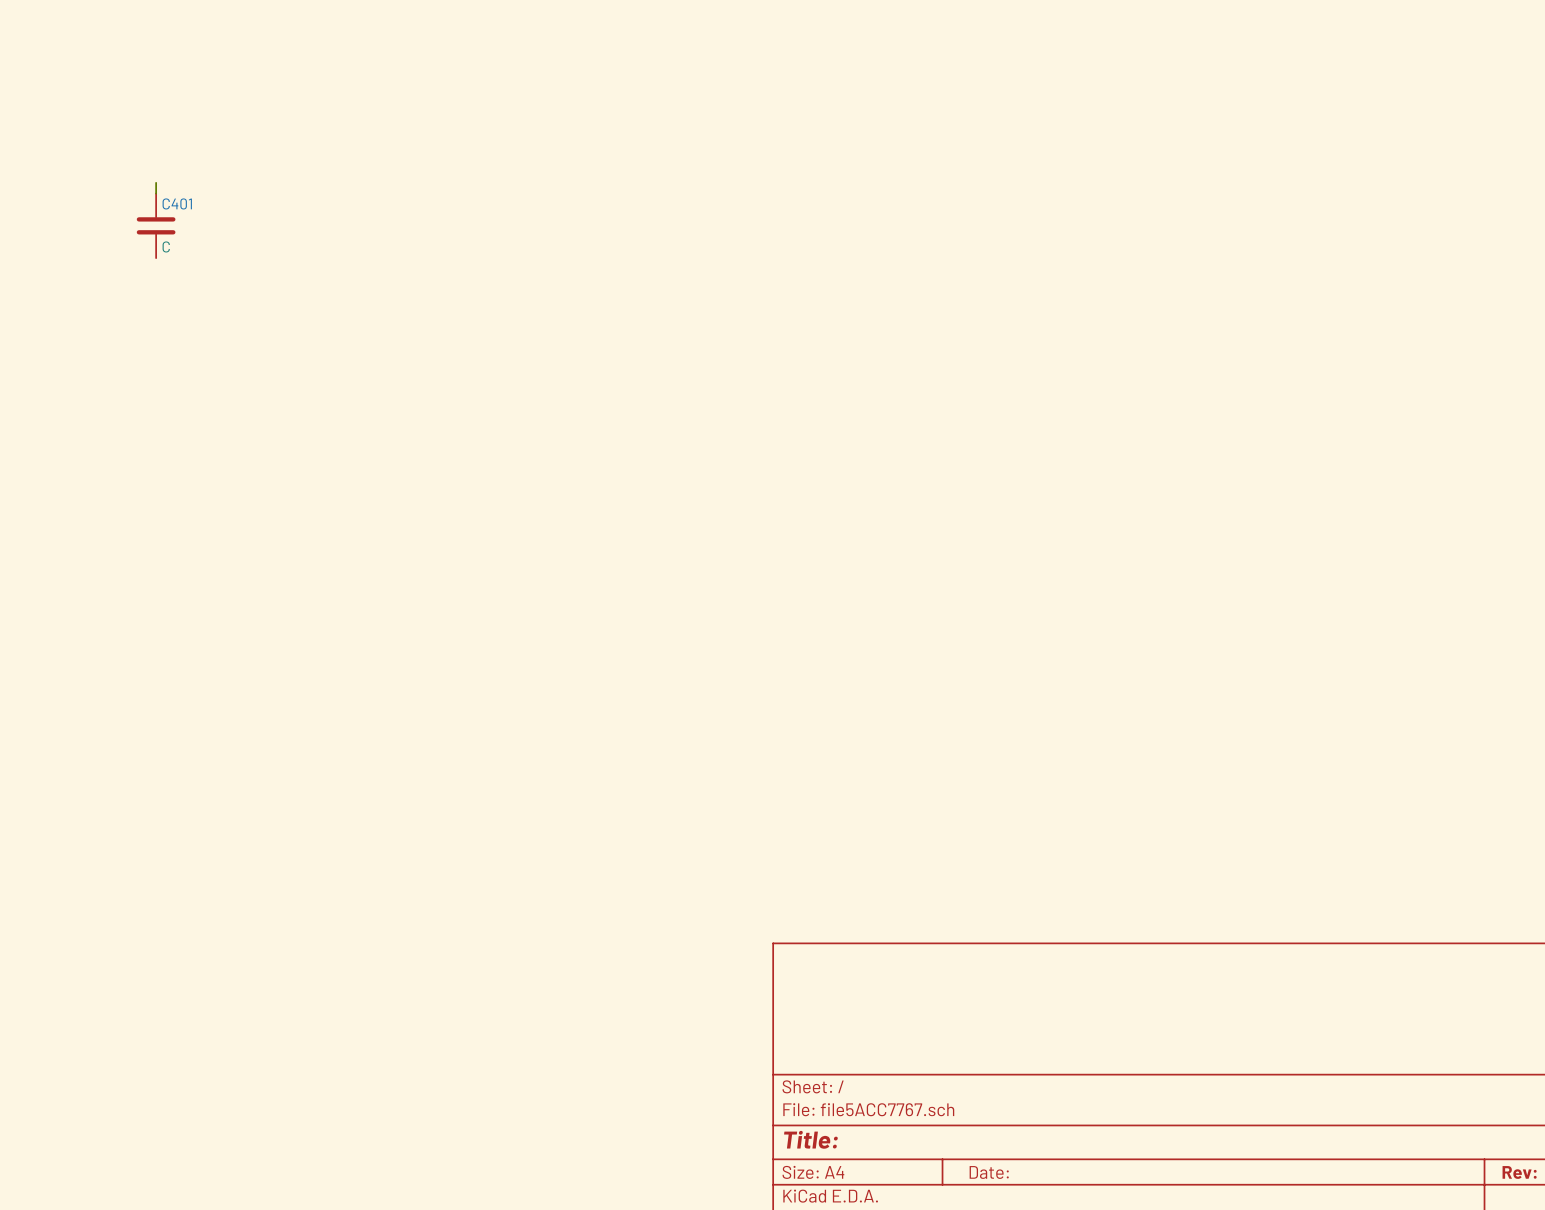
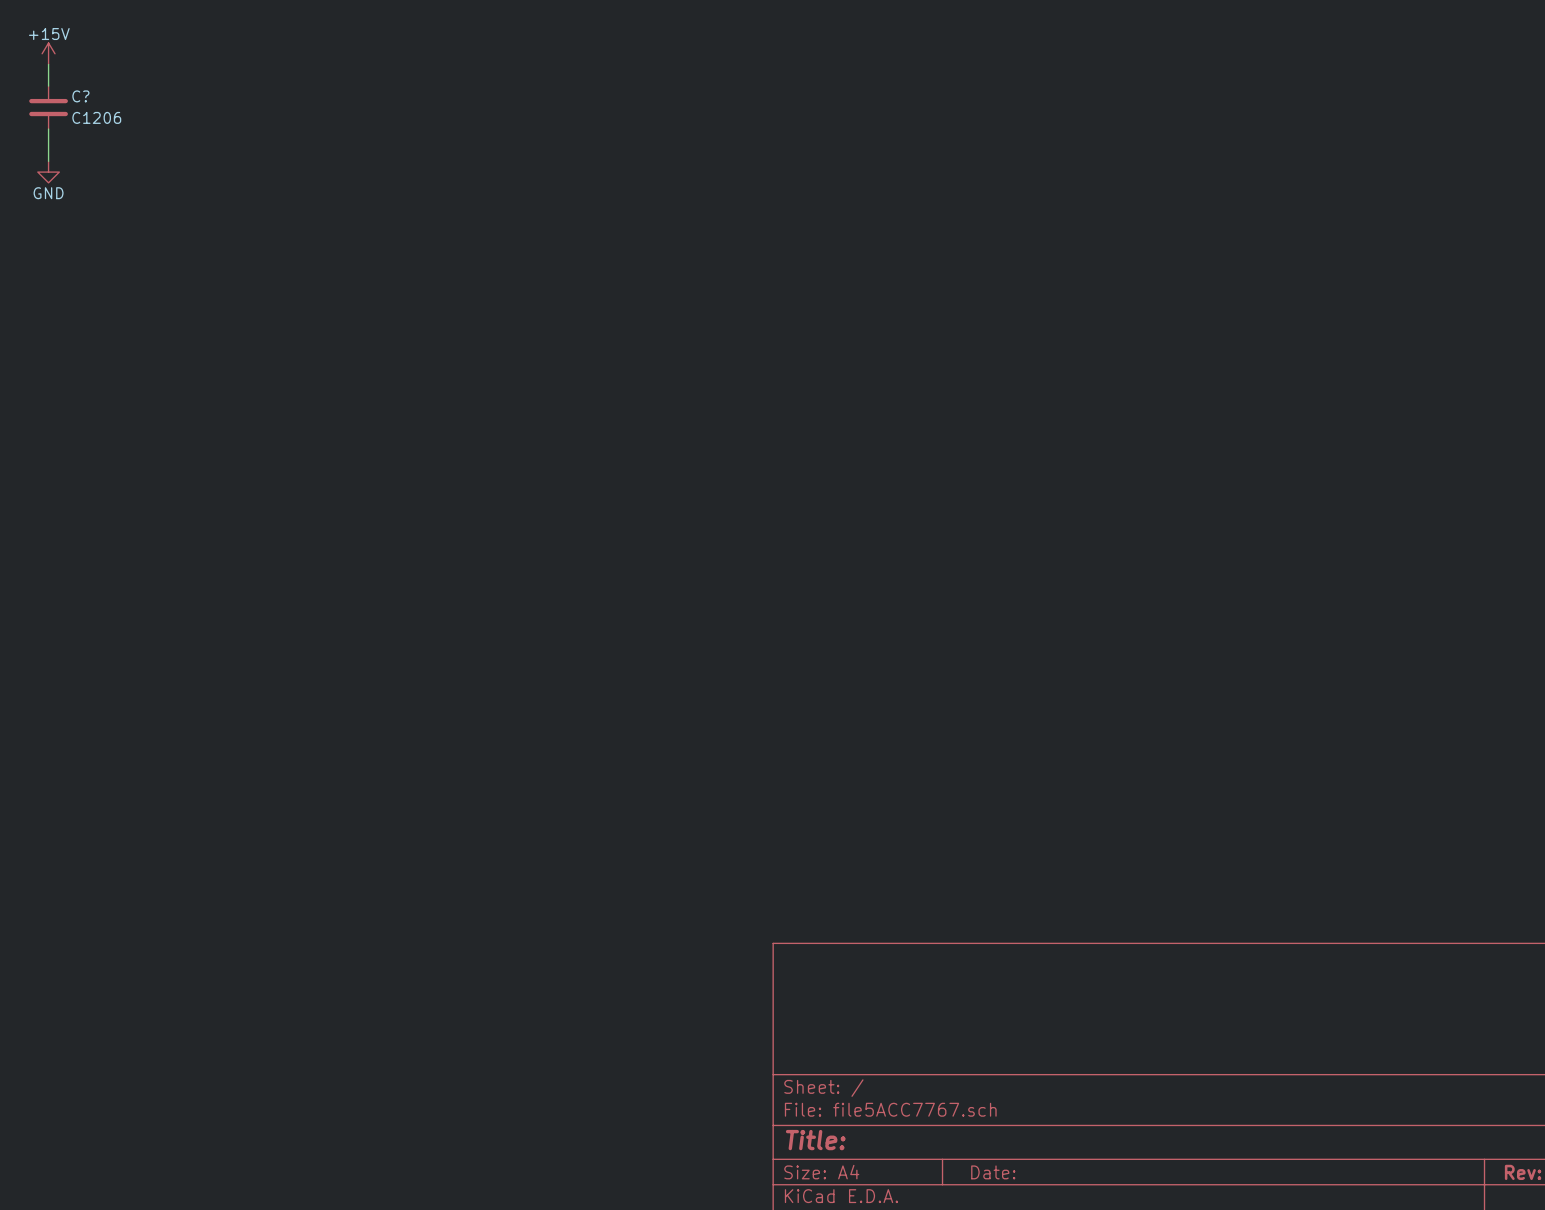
power symbol: none -> +15V (48, 53)
wire: none -> (48, 64) (48, 86)
C?: none -> C1206 (48, 107)
wire: none -> (48, 129) (48, 161)
power symbol: none -> GND (48, 172)
wire: (156, 182) (156, 193) -> none
C401: C (156, 225) -> none

